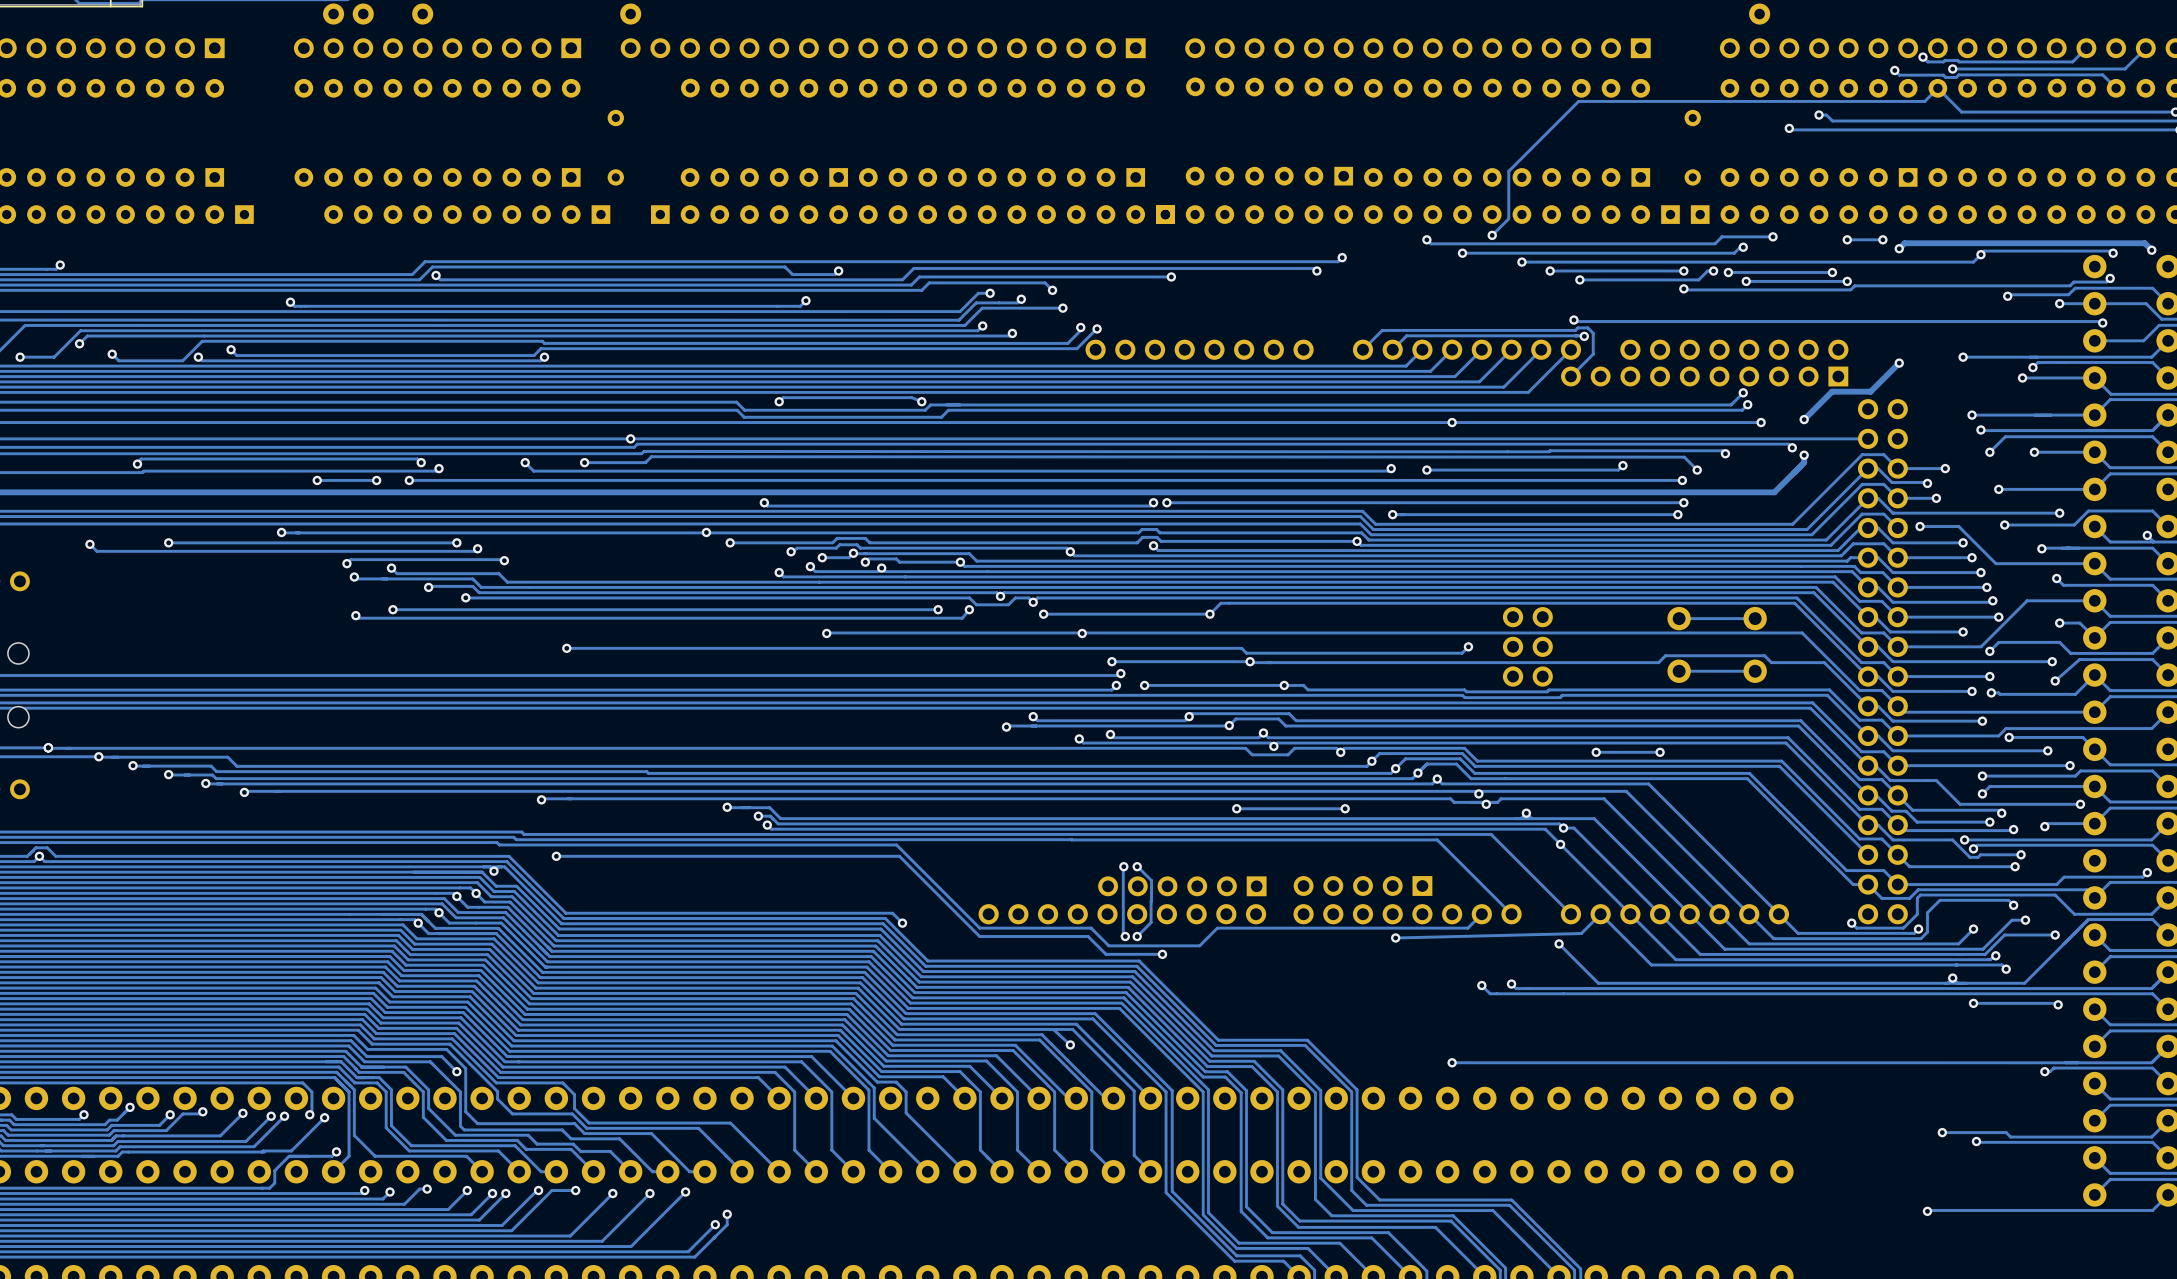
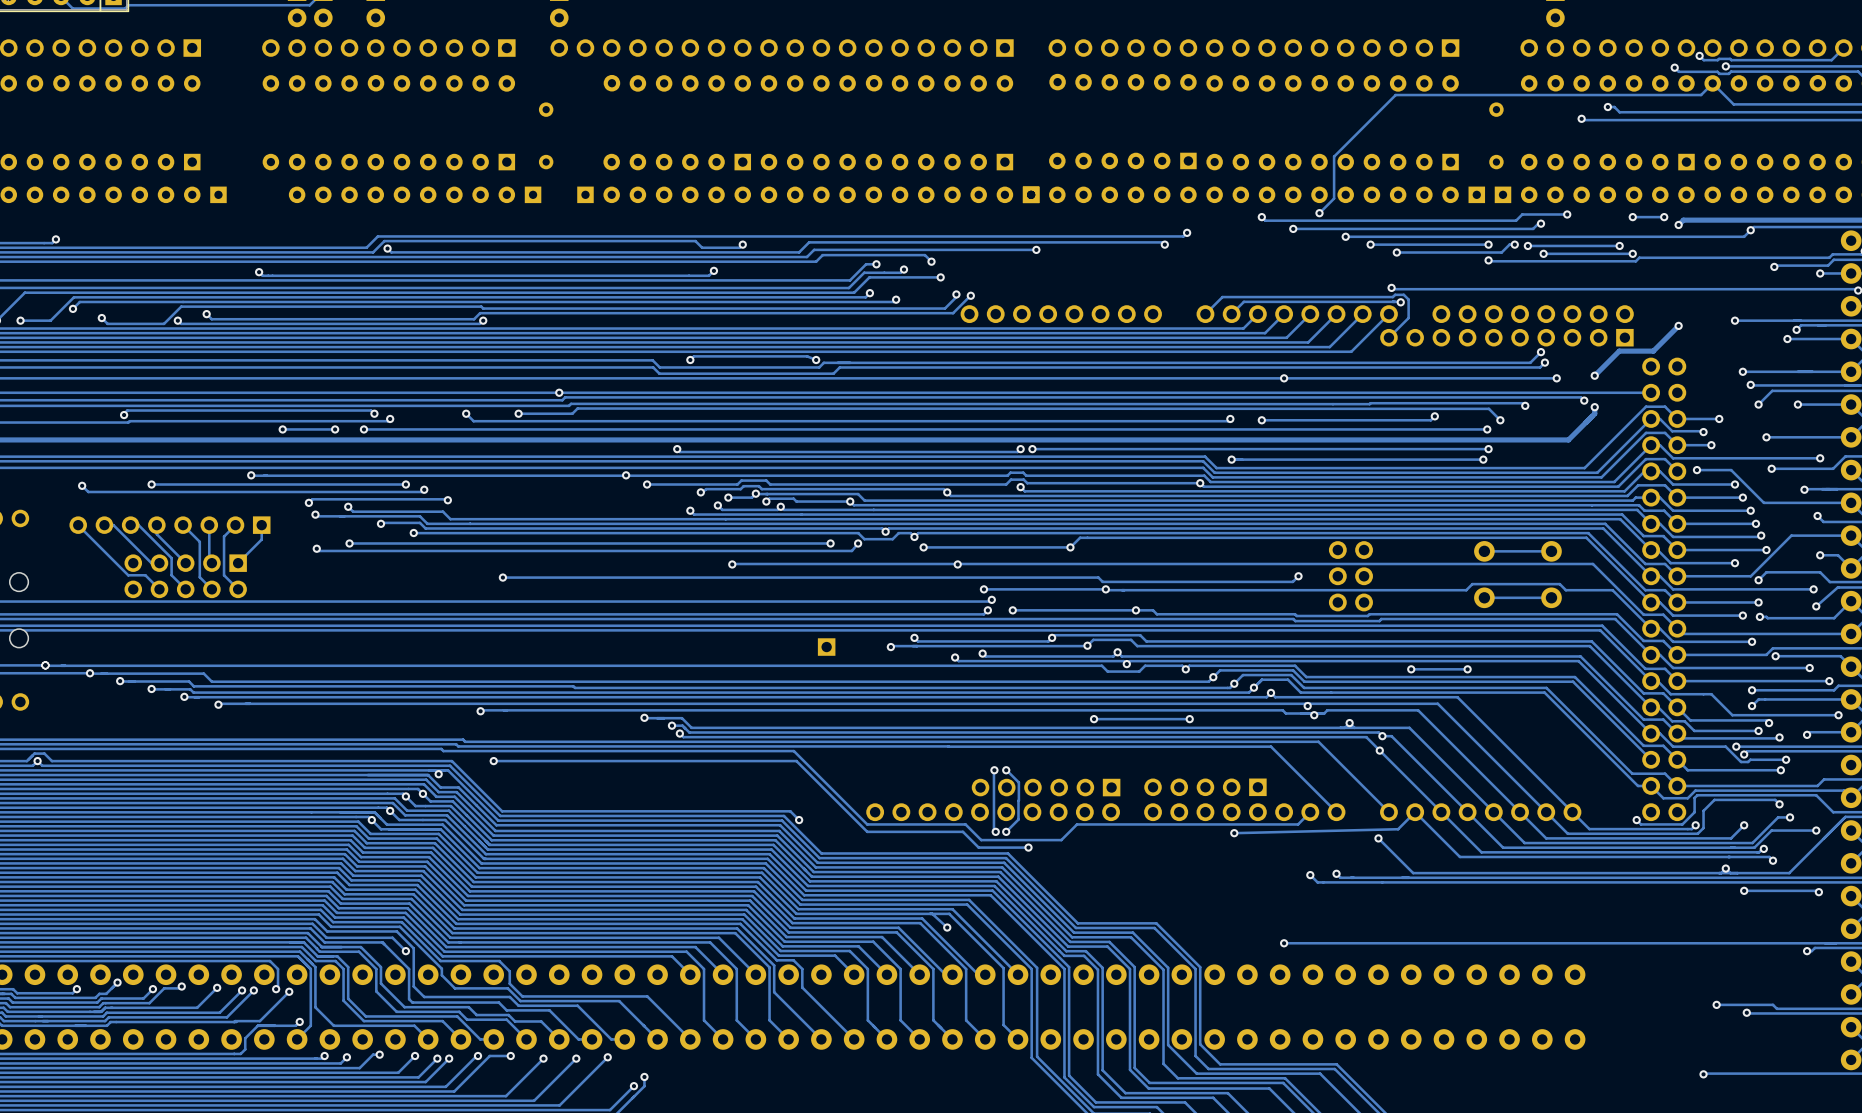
track: none -> (104, 525) (113, 525) (151, 563) (159, 563)
track: none -> (130, 525) (138, 525) (171, 558) (171, 575) (185, 589)
track: none -> (156, 525) (156, 534) (185, 563)
part: none -> (169, 525)
track: none -> (183, 525) (199, 541) (199, 577) (211, 589)
track: none -> (209, 525) (209, 560) (211, 563)
track: none -> (235, 525) (224, 536) (224, 575) (238, 589)
track: none -> (261, 525) (261, 539) (238, 563)
track: none -> (78, 525) (128, 575) (145, 575) (159, 589)
part: none -> (185, 576)
part: none -> (826, 647)

